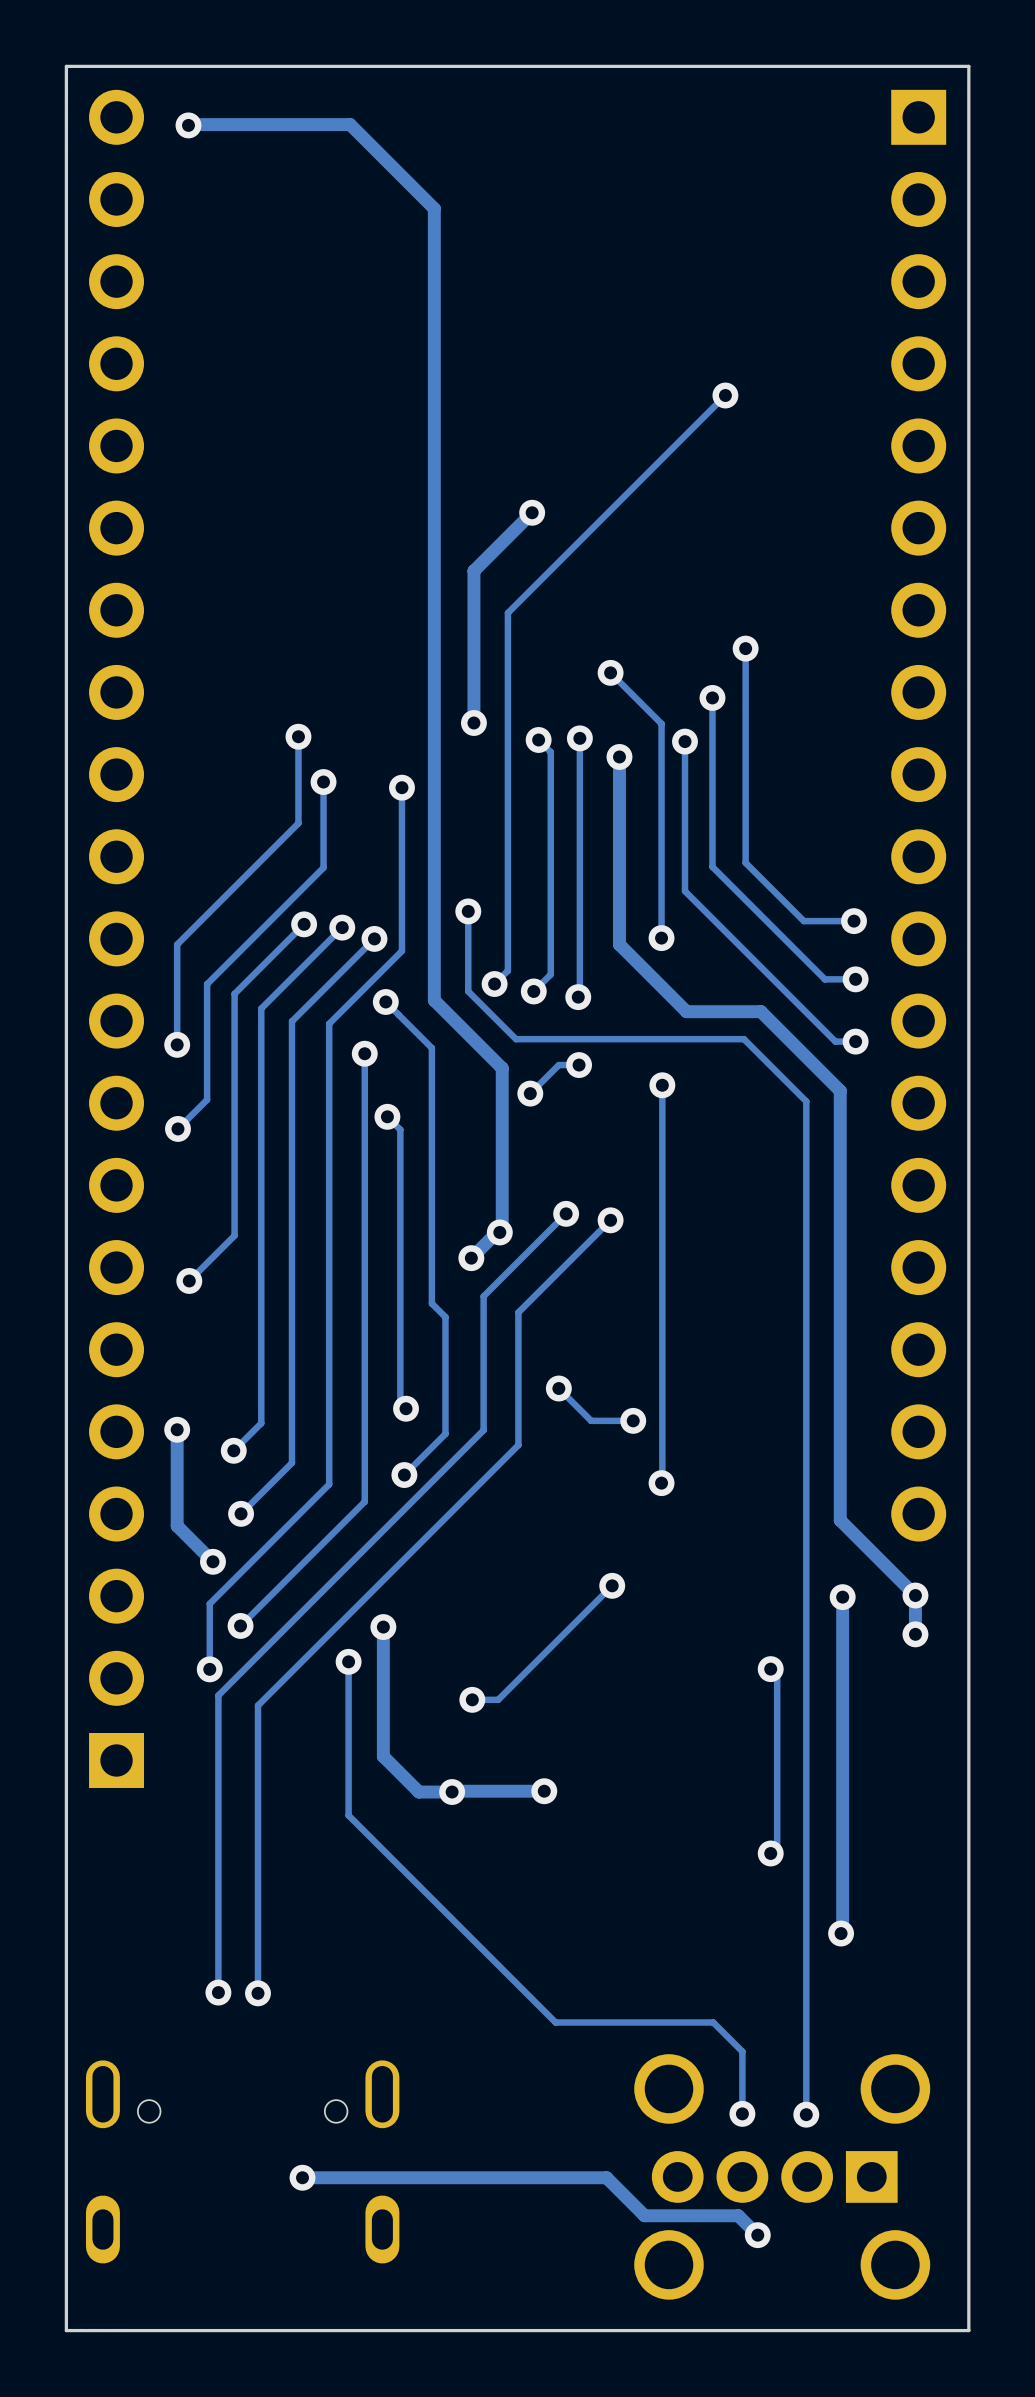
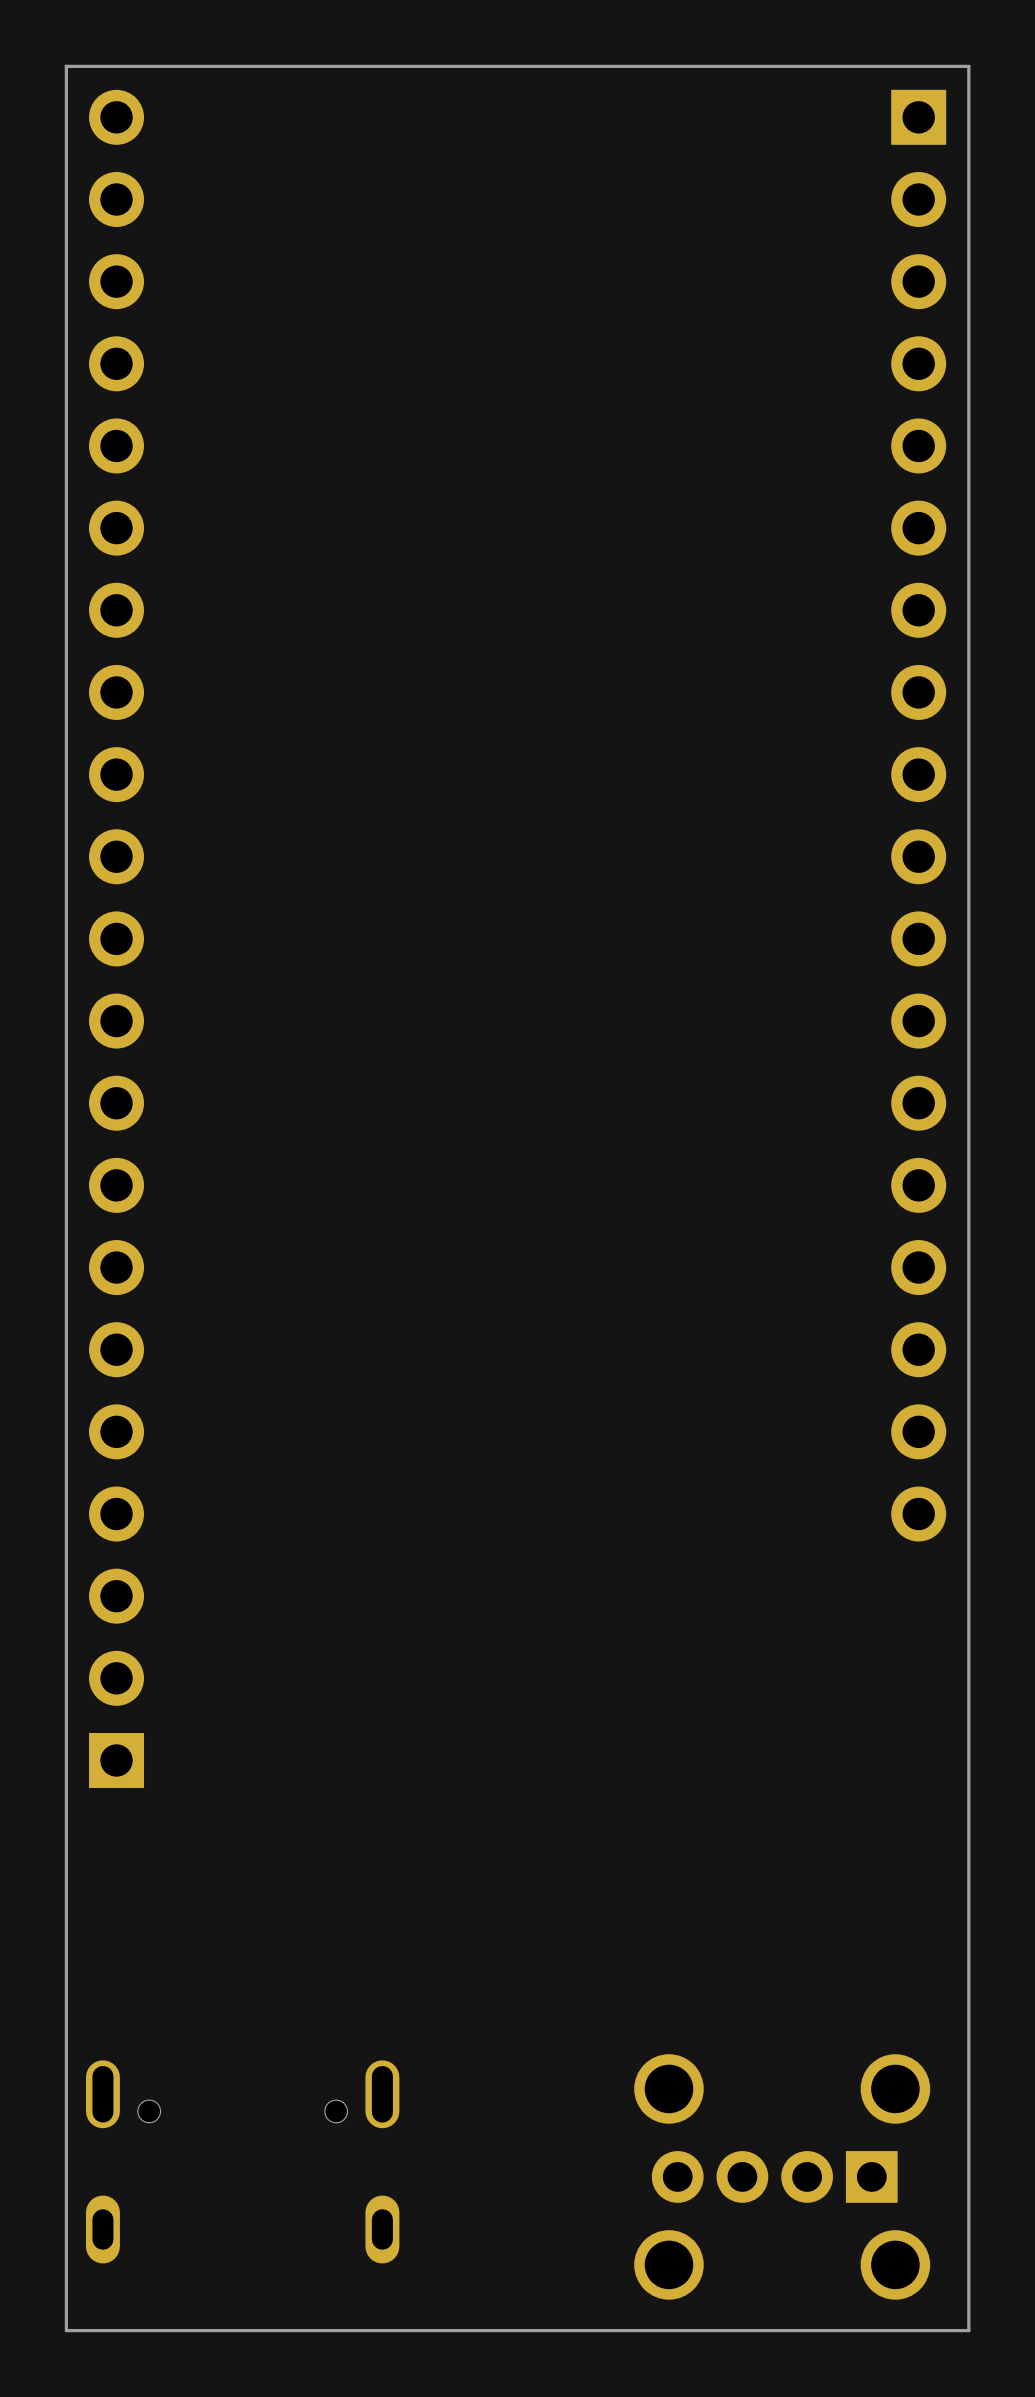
track: (188, 125) (350, 124) (434, 208) (434, 1000) (502, 1068) (502, 1230) (497, 1232) (471, 1258) (474, 1258) -> none
via: (188, 125) -> none
track: (725, 395) (507, 613) (507, 970) (494, 984) -> none
via: (725, 395) -> none
track: (532, 512) (473, 570) (473, 723) -> none
via: (532, 512) -> none
track: (745, 648) (745, 862) (803, 921) (854, 921) -> none
via: (745, 648) -> none
track: (610, 672) (661, 723) (661, 938) -> none
via: (610, 672) -> none
track: (712, 697) (712, 866) (824, 979) (855, 979) -> none
via: (712, 697) -> none
via: (473, 723) -> none
track: (298, 736) (298, 823) (177, 944) (177, 1044) -> none
via: (298, 736) -> none
track: (579, 738) (579, 995) (578, 997) -> none
via: (579, 738) -> none
track: (538, 739) (550, 752) (550, 974) (533, 991) -> none
via: (538, 739) -> none
track: (685, 741) (685, 891) (835, 1041) (855, 1041) -> none
via: (685, 741) -> none
track: (619, 756) (619, 944) (686, 1011) (761, 1011) (840, 1090) (840, 1520) (915, 1595) (915, 1634) -> none
via: (619, 756) -> none
track: (323, 782) (323, 867) (207, 984) (207, 1099) (177, 1128) -> none
via: (323, 782) -> none
track: (401, 787) (401, 951) (329, 1023) (329, 1484) (209, 1603) (209, 1669) -> none
via: (401, 787) -> none
track: (468, 911) (468, 991) (515, 1039) (744, 1039) (806, 1101) (806, 2114) -> none
via: (468, 911) -> none
via: (854, 921) -> none
track: (304, 924) (234, 993) (234, 1235) (189, 1280) -> none
via: (304, 924) -> none
track: (342, 927) (261, 1008) (261, 1423) (233, 1450) -> none
via: (342, 927) -> none
track: (374, 938) (292, 1021) (292, 1462) (241, 1513) -> none
via: (374, 938) -> none
via: (661, 938) -> none
via: (855, 979) -> none
via: (494, 984) -> none
via: (533, 991) -> none
via: (578, 997) -> none
track: (385, 1001) (431, 1048) (431, 1303) (445, 1317) (445, 1433) (404, 1475) -> none
via: (385, 1001) -> none
via: (855, 1041) -> none
via: (177, 1044) -> none
track: (364, 1053) (364, 1501) (240, 1625) -> none
via: (364, 1053) -> none
track: (579, 1065) (558, 1065) (530, 1093) -> none
via: (579, 1065) -> none
track: (662, 1085) (661, 1483) -> none
via: (662, 1085) -> none
via: (530, 1093) -> none
track: (387, 1116) (400, 1129) (400, 1403) (406, 1408) -> none
via: (387, 1116) -> none
via: (177, 1128) -> none
track: (566, 1213) (483, 1296) (483, 1430) (218, 1695) (218, 1992) -> none
via: (566, 1213) -> none
track: (610, 1220) (518, 1312) (518, 1445) (257, 1705) (257, 1993) -> none
via: (610, 1220) -> none
via: (499, 1232) -> none
via: (471, 1258) -> none
via: (189, 1280) -> none
track: (558, 1388) (591, 1420) (633, 1420) -> none
via: (558, 1388) -> none
via: (406, 1408) -> none
via: (633, 1420) -> none
track: (177, 1429) (177, 1525) (212, 1561) -> none
via: (177, 1429) -> none
via: (233, 1450) -> none
via: (404, 1475) -> none
via: (661, 1483) -> none
via: (241, 1513) -> none
via: (212, 1561) -> none
track: (612, 1585) (498, 1699) (472, 1699) -> none
via: (612, 1585) -> none
via: (915, 1595) -> none
track: (842, 1597) (842, 1931) (841, 1933) -> none
via: (842, 1597) -> none
via: (240, 1625) -> none
track: (383, 1627) (383, 1756) (418, 1792) (544, 1791) -> none
via: (383, 1627) -> none
via: (915, 1634) -> none
track: (348, 1661) (348, 1815) (555, 2022) (713, 2022) (742, 2051) (742, 2113) -> none
via: (348, 1661) -> none
via: (209, 1669) -> none
track: (770, 1669) (777, 1675) (777, 1847) (770, 1853) -> none
via: (770, 1669) -> none
via: (472, 1699) -> none
via: (544, 1791) -> none
via: (452, 1792) -> none
via: (770, 1853) -> none
via: (841, 1933) -> none
via: (218, 1992) -> none
via: (257, 1993) -> none
via: (742, 2113) -> none
via: (806, 2114) -> none
track: (302, 2177) (606, 2177) (644, 2215) (738, 2215) (757, 2235) -> none
via: (302, 2177) -> none
via: (757, 2235) -> none

